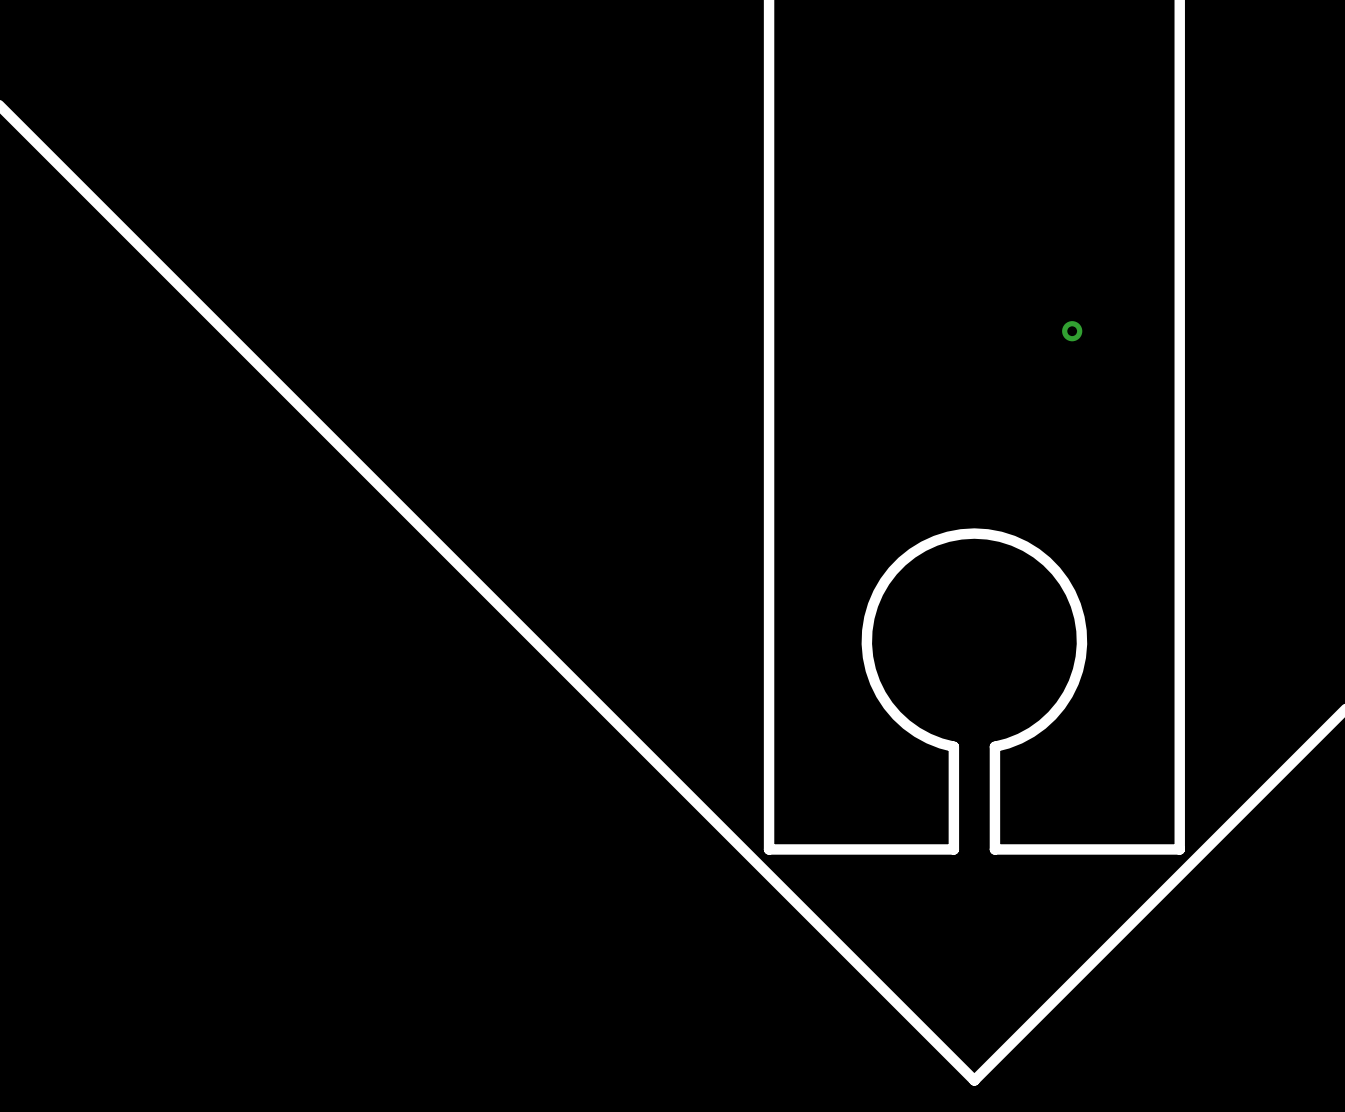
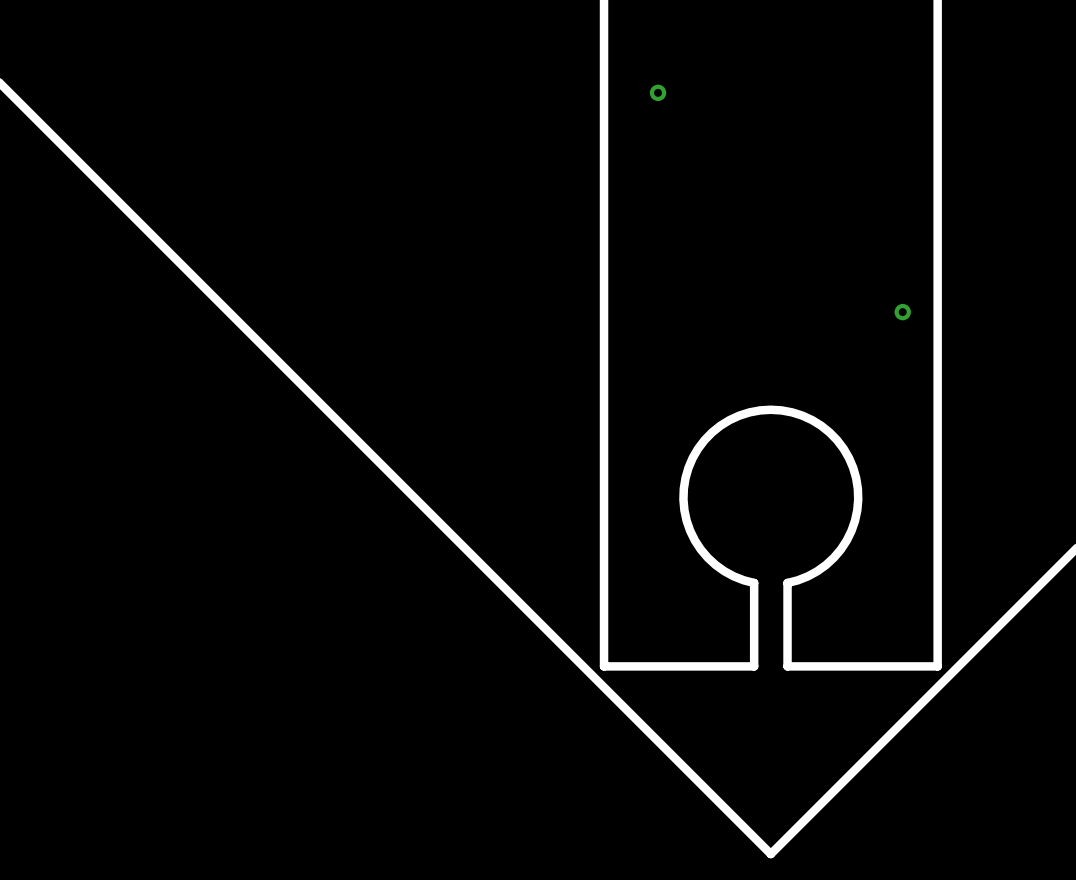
via: none -> (658, 92)
via position: (1072, 331) -> (902, 312)

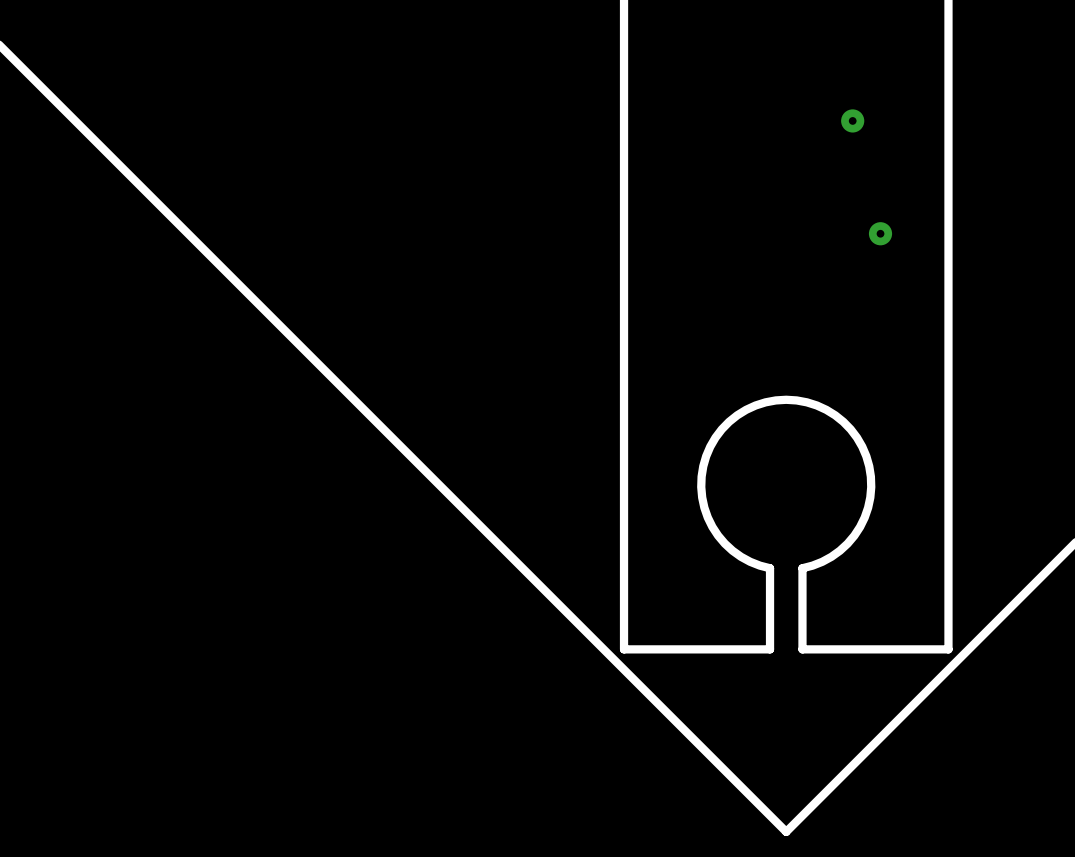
via: (658, 92) -> none
via: none -> (852, 120)
via: none -> (880, 233)
via: (902, 312) -> none

